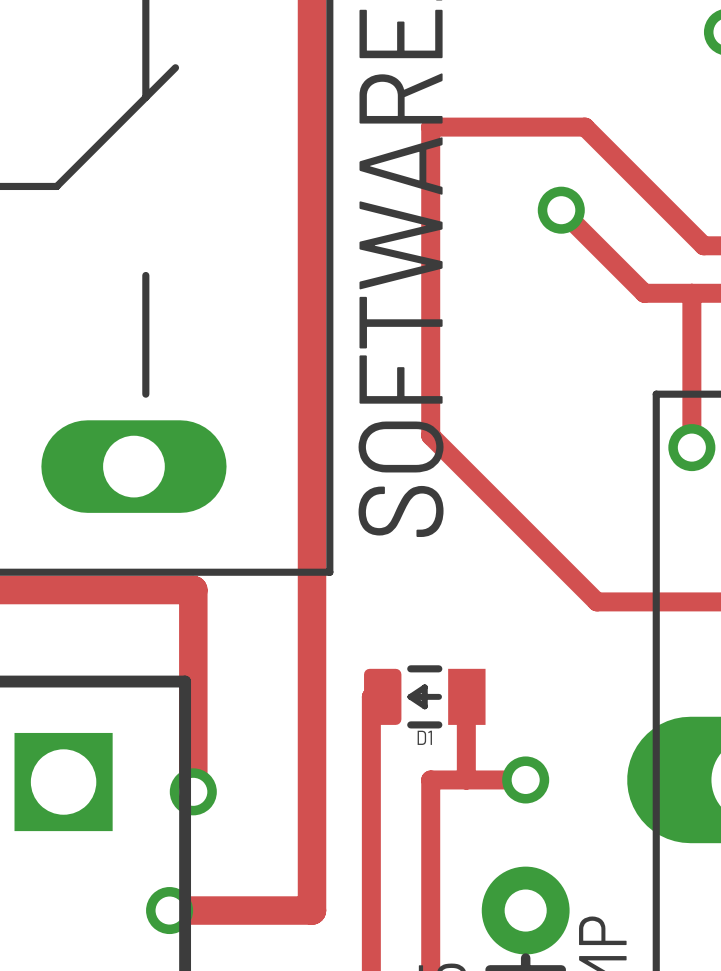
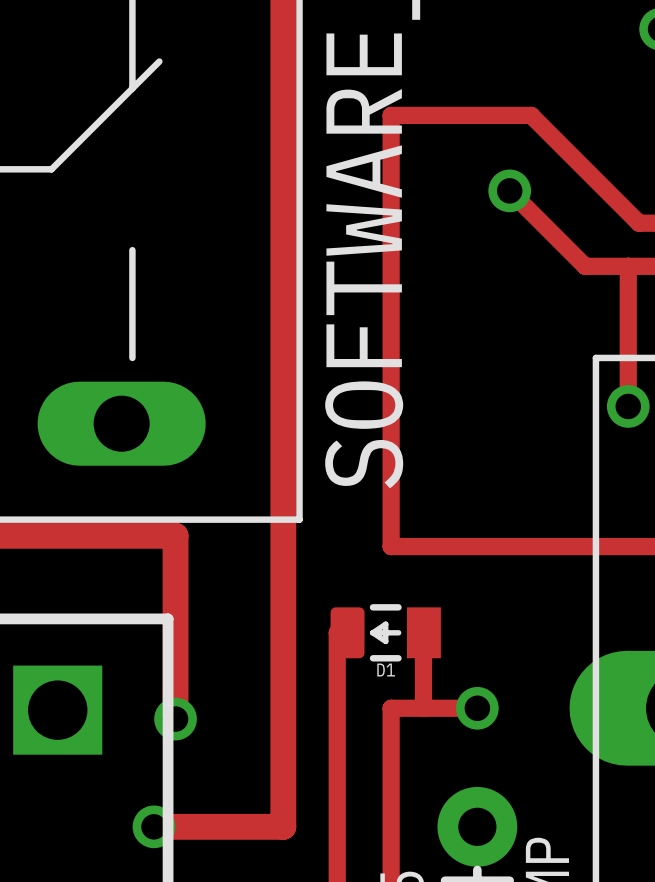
track: (430, 435) (596, 601) -> (391, 395) (391, 546) (542, 546)

